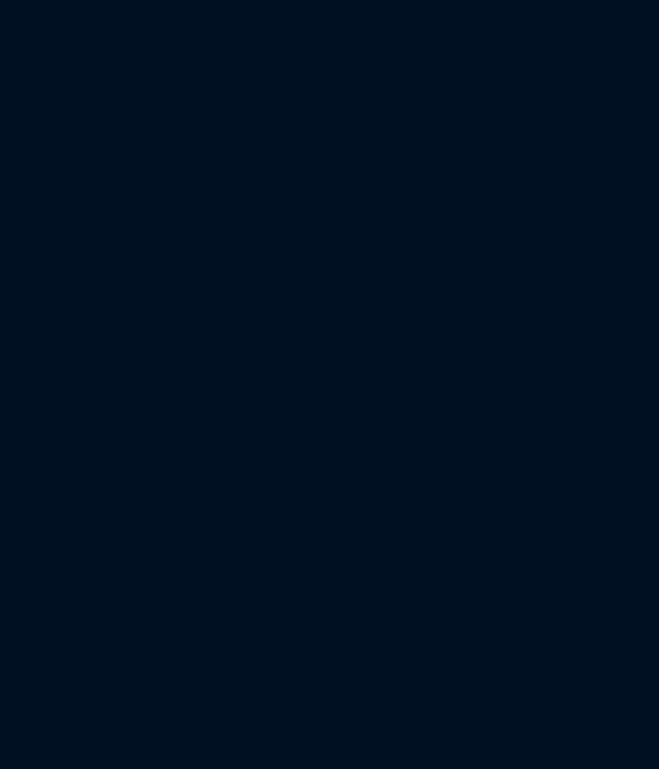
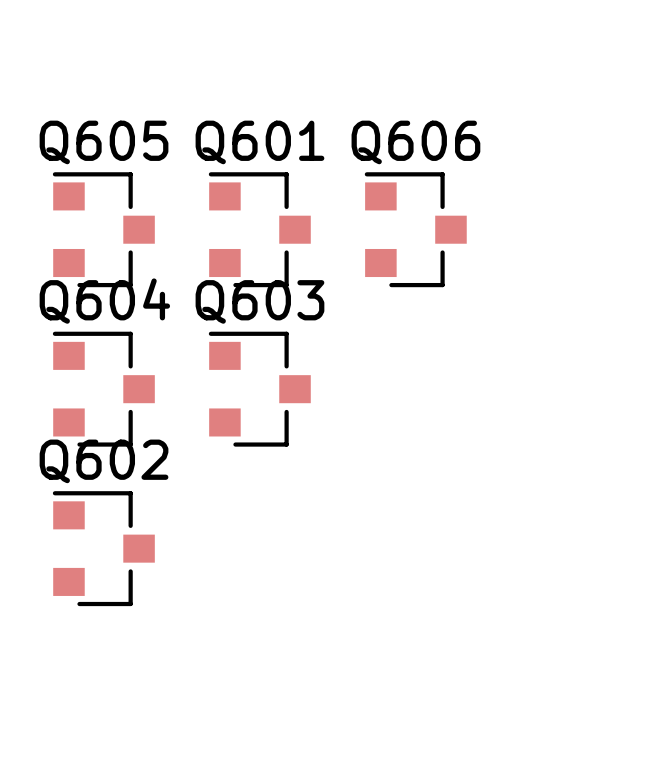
Q605: none -> (103, 229)
Q601: none -> (259, 229)
Q606: none -> (415, 229)
Q604: none -> (103, 389)
Q603: none -> (259, 389)
Q602: none -> (103, 548)

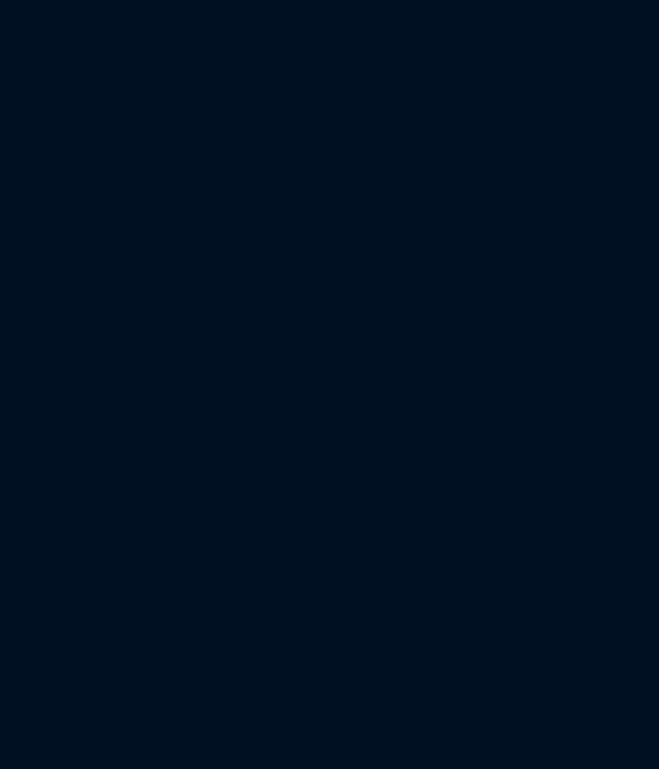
Q605: (103, 229) -> none
Q601: (259, 229) -> none
Q606: (415, 229) -> none
Q604: (103, 389) -> none
Q603: (259, 389) -> none
Q602: (103, 548) -> none

